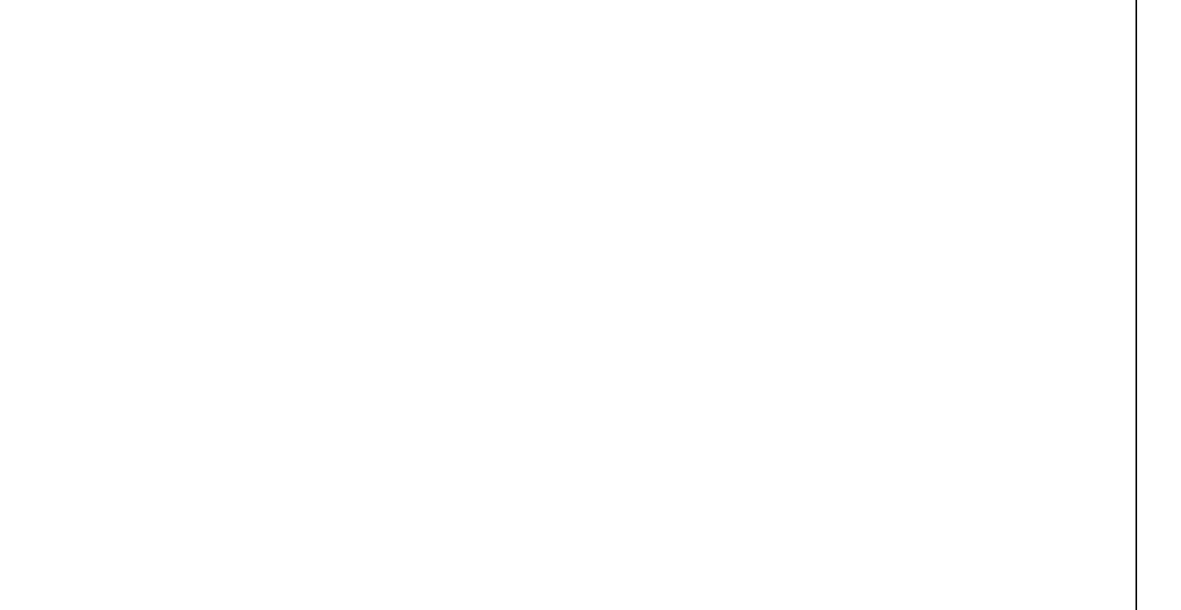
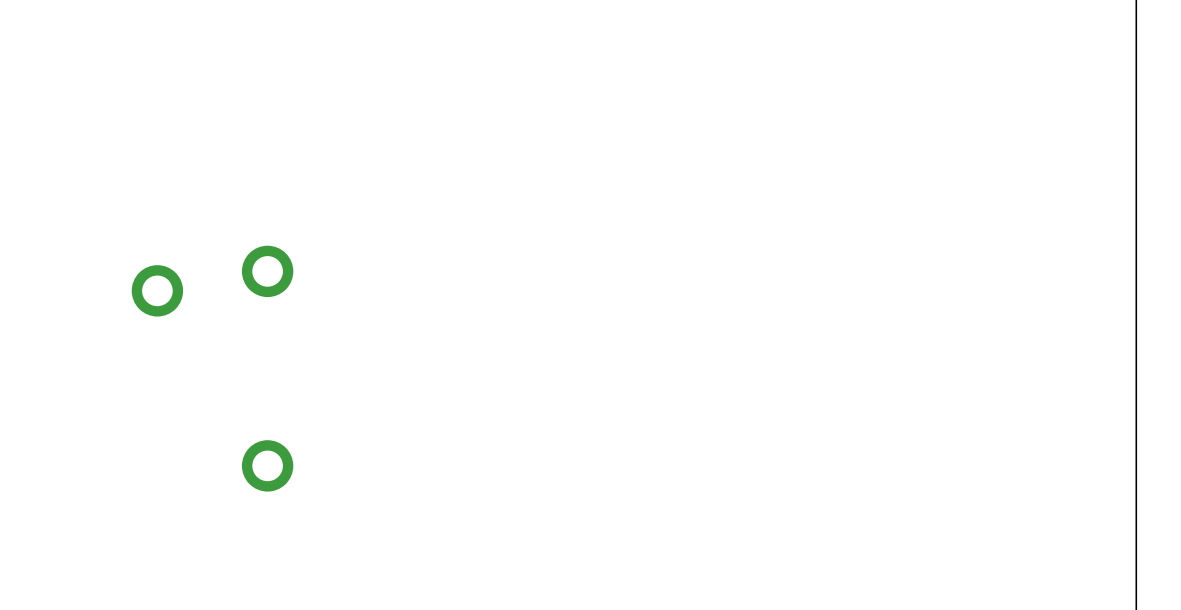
via: none -> (267, 271)
via: none -> (157, 290)
via: none -> (267, 465)

